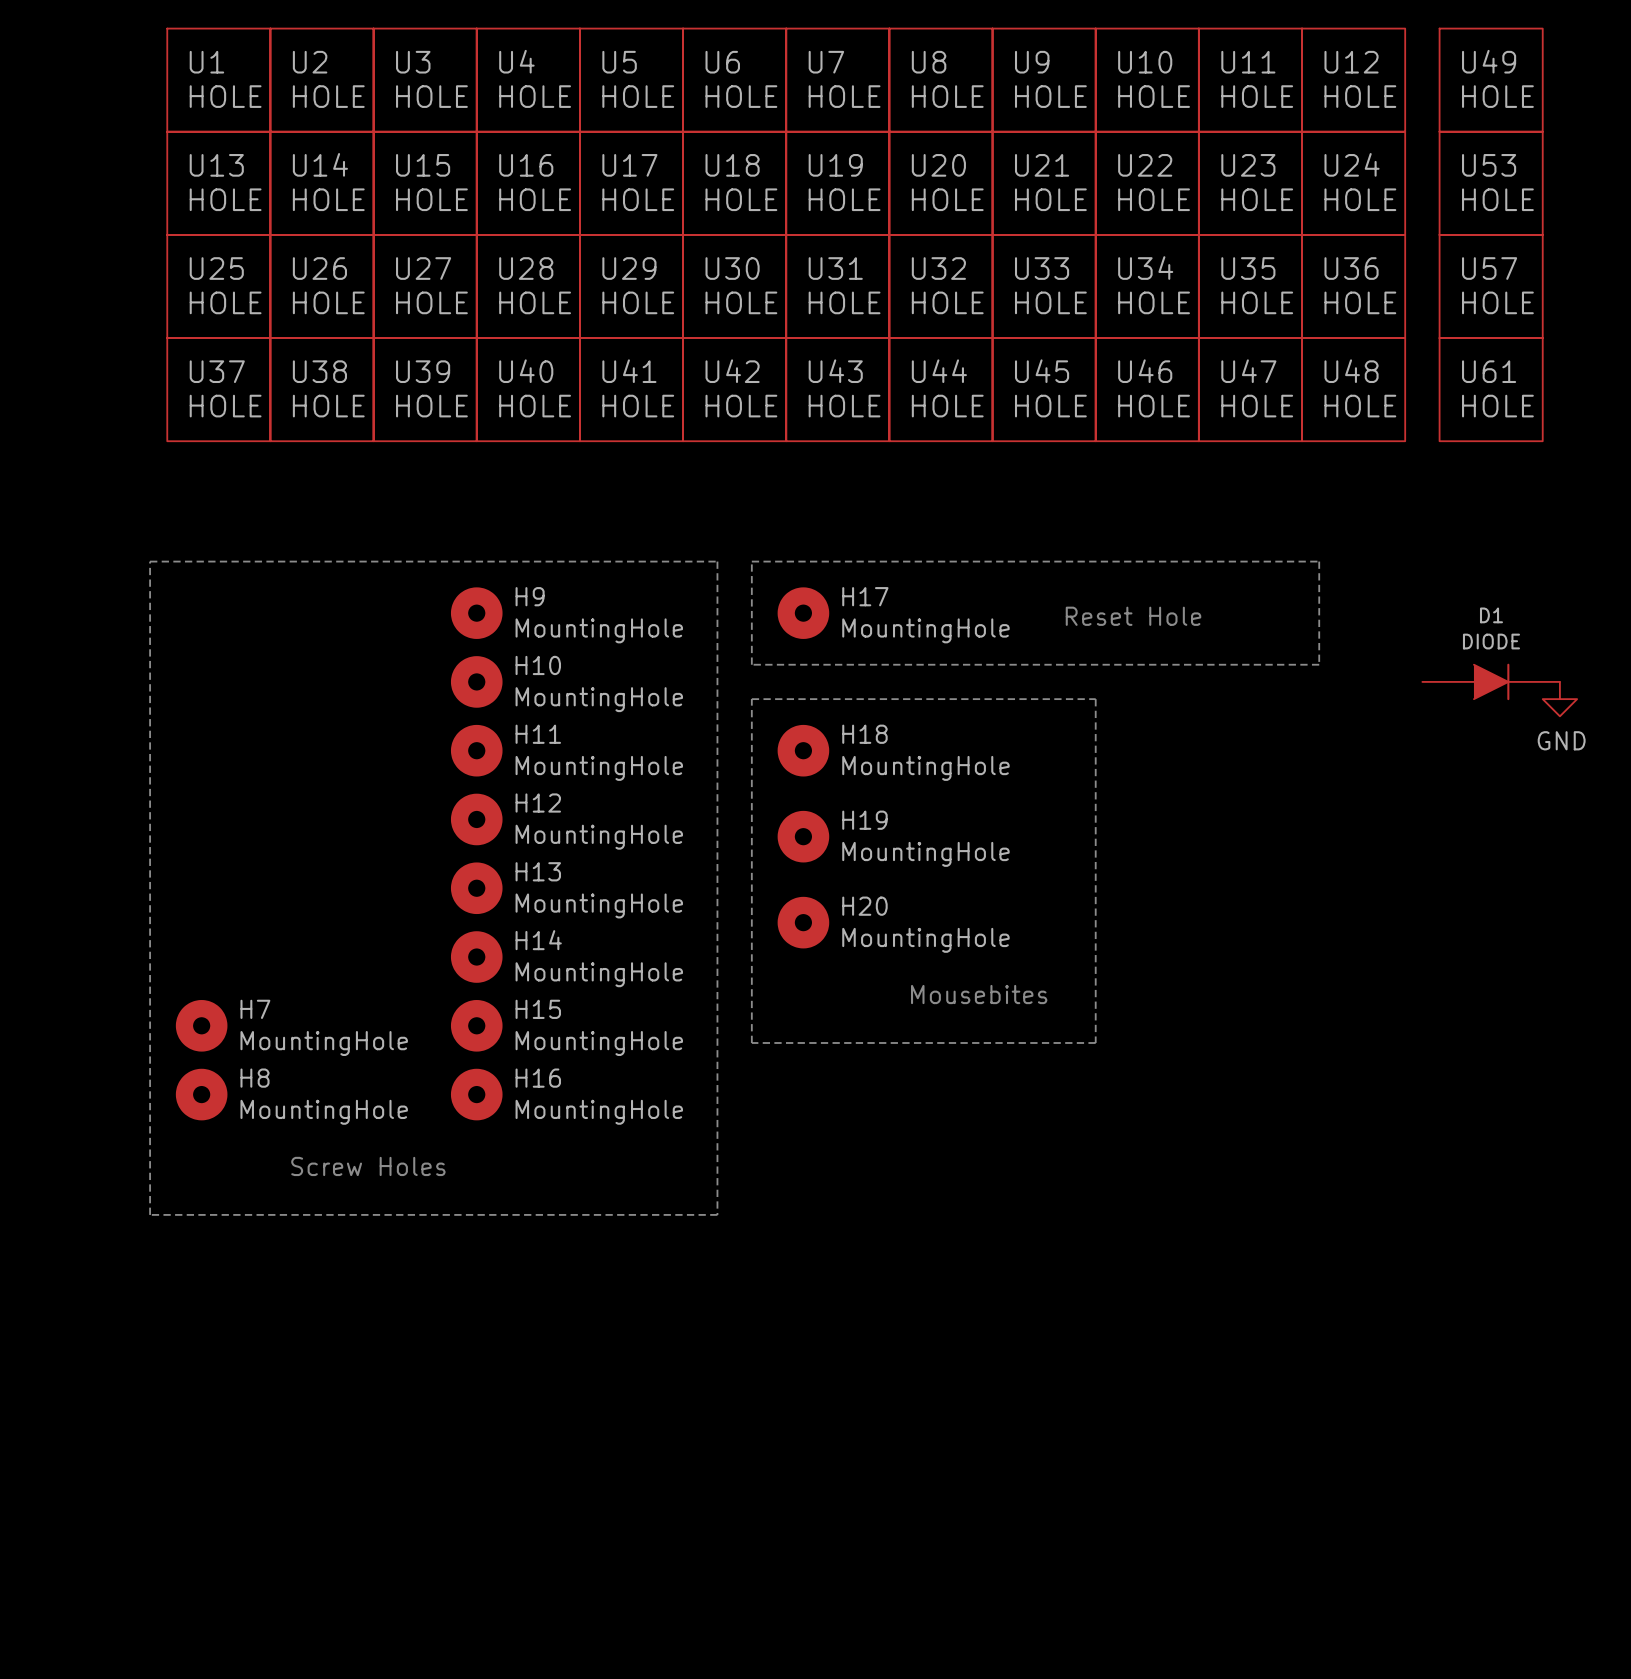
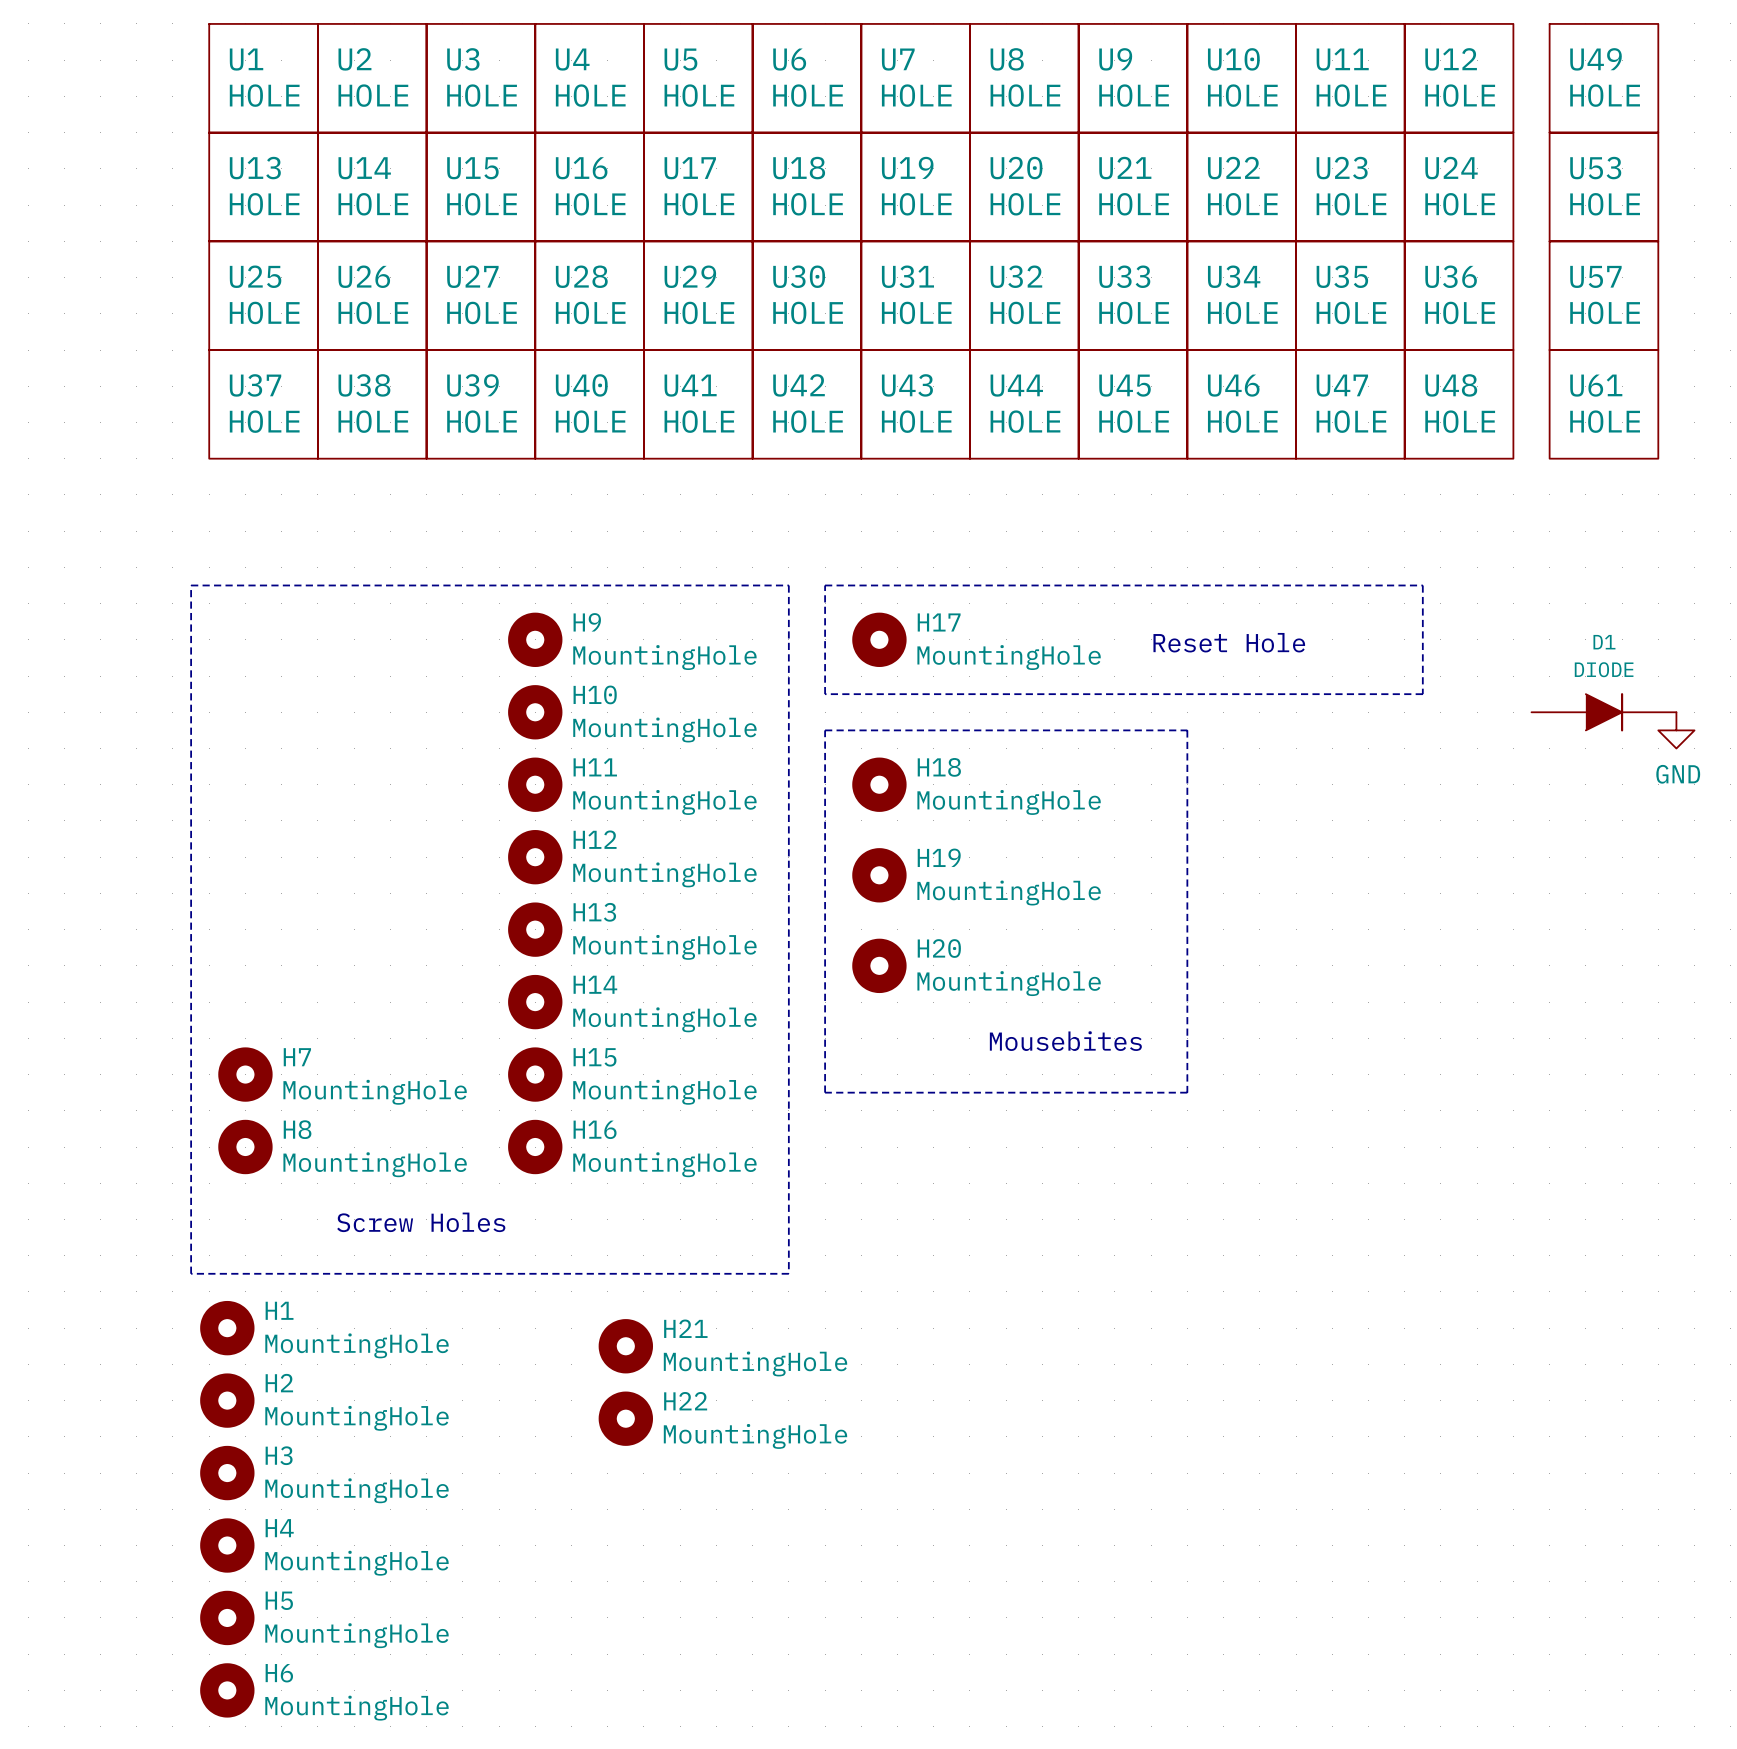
H1: none -> MountingHole (227, 1328)
H21: none -> MountingHole (625, 1346)
H2: none -> MountingHole (227, 1400)
H22: none -> MountingHole (625, 1418)
H3: none -> MountingHole (227, 1473)
H4: none -> MountingHole (227, 1545)
H5: none -> MountingHole (227, 1617)
H6: none -> MountingHole (227, 1690)

